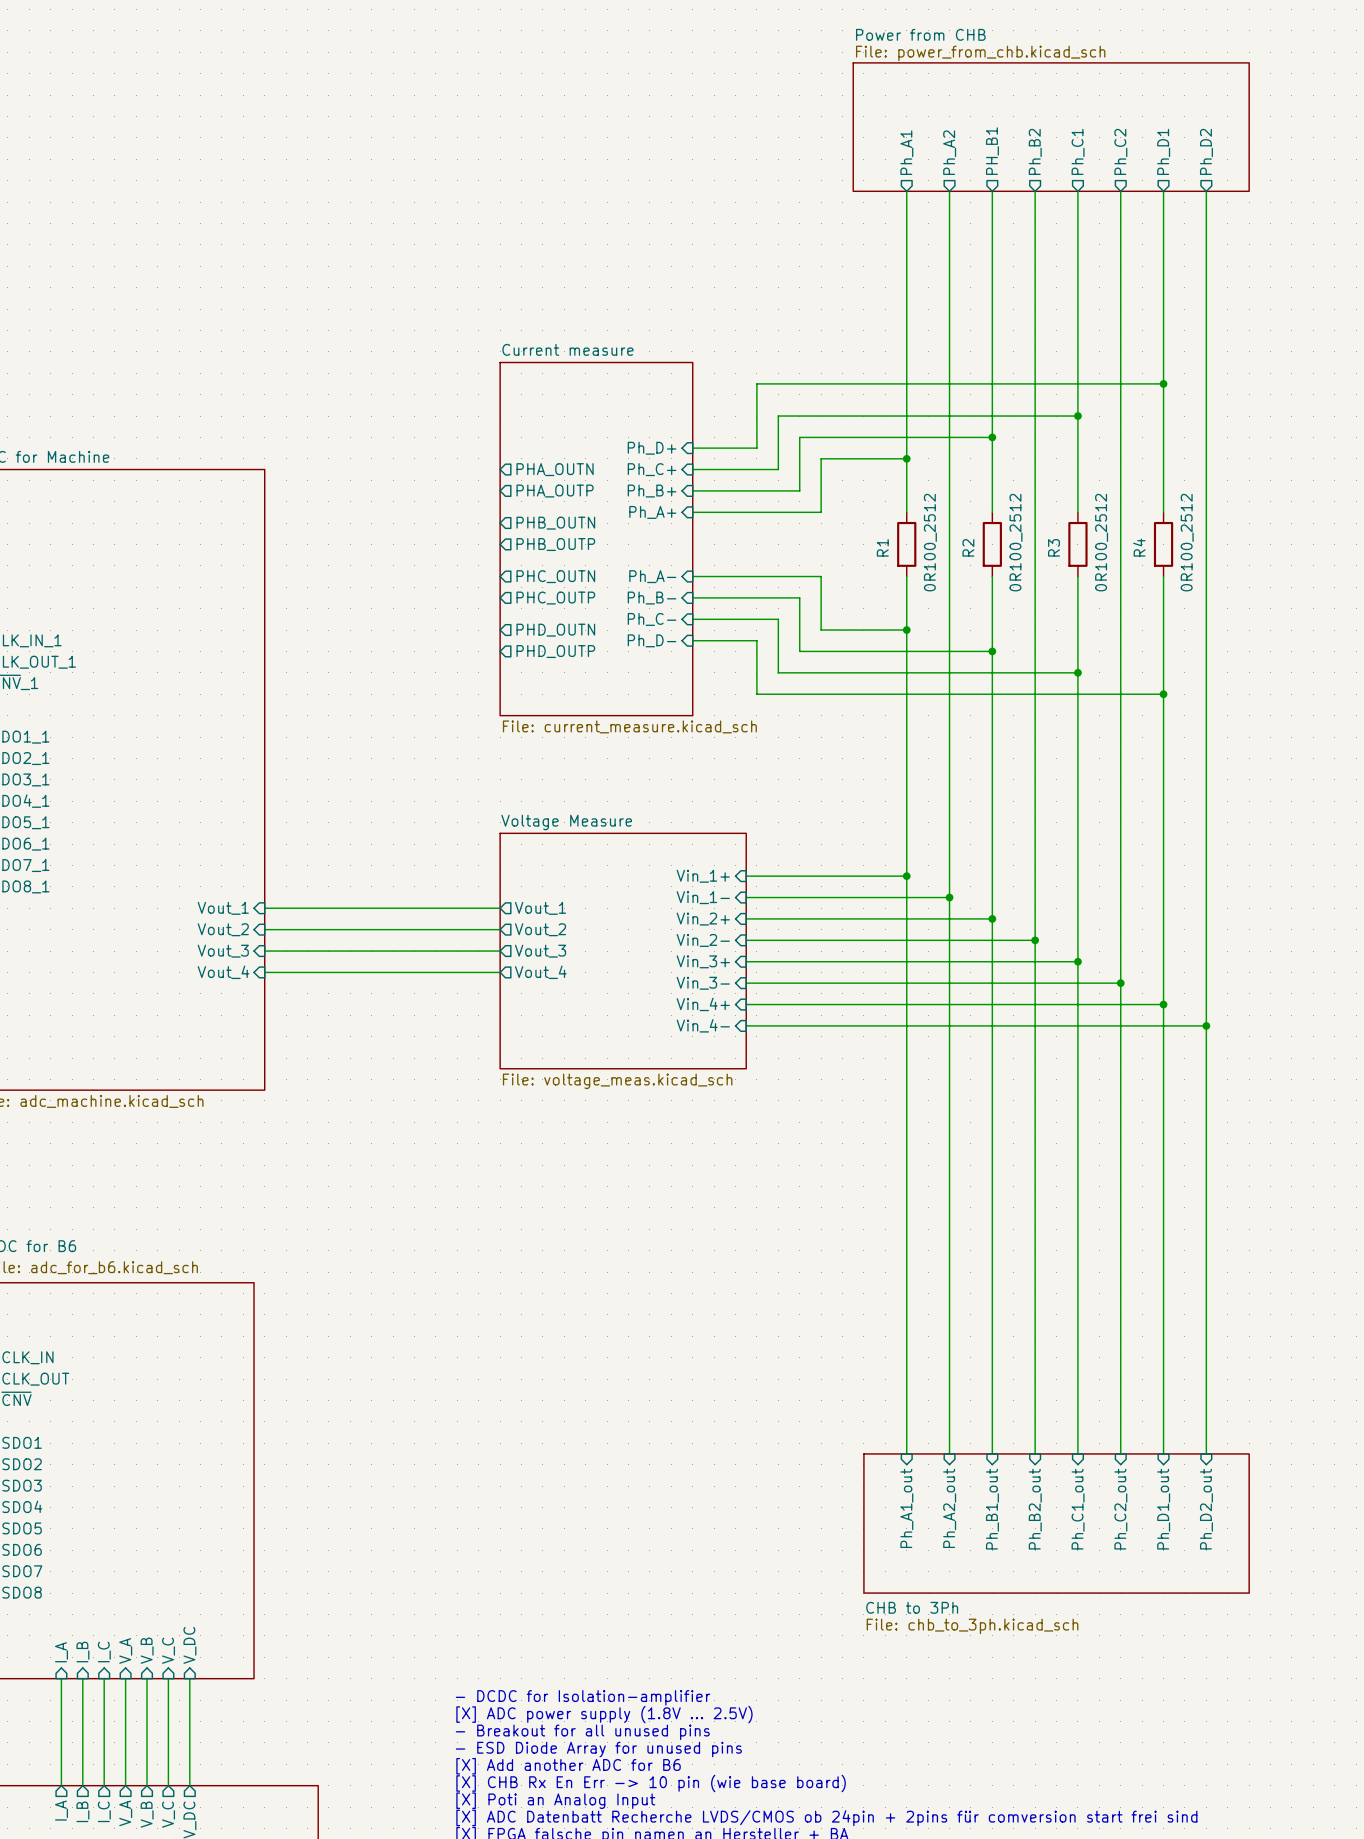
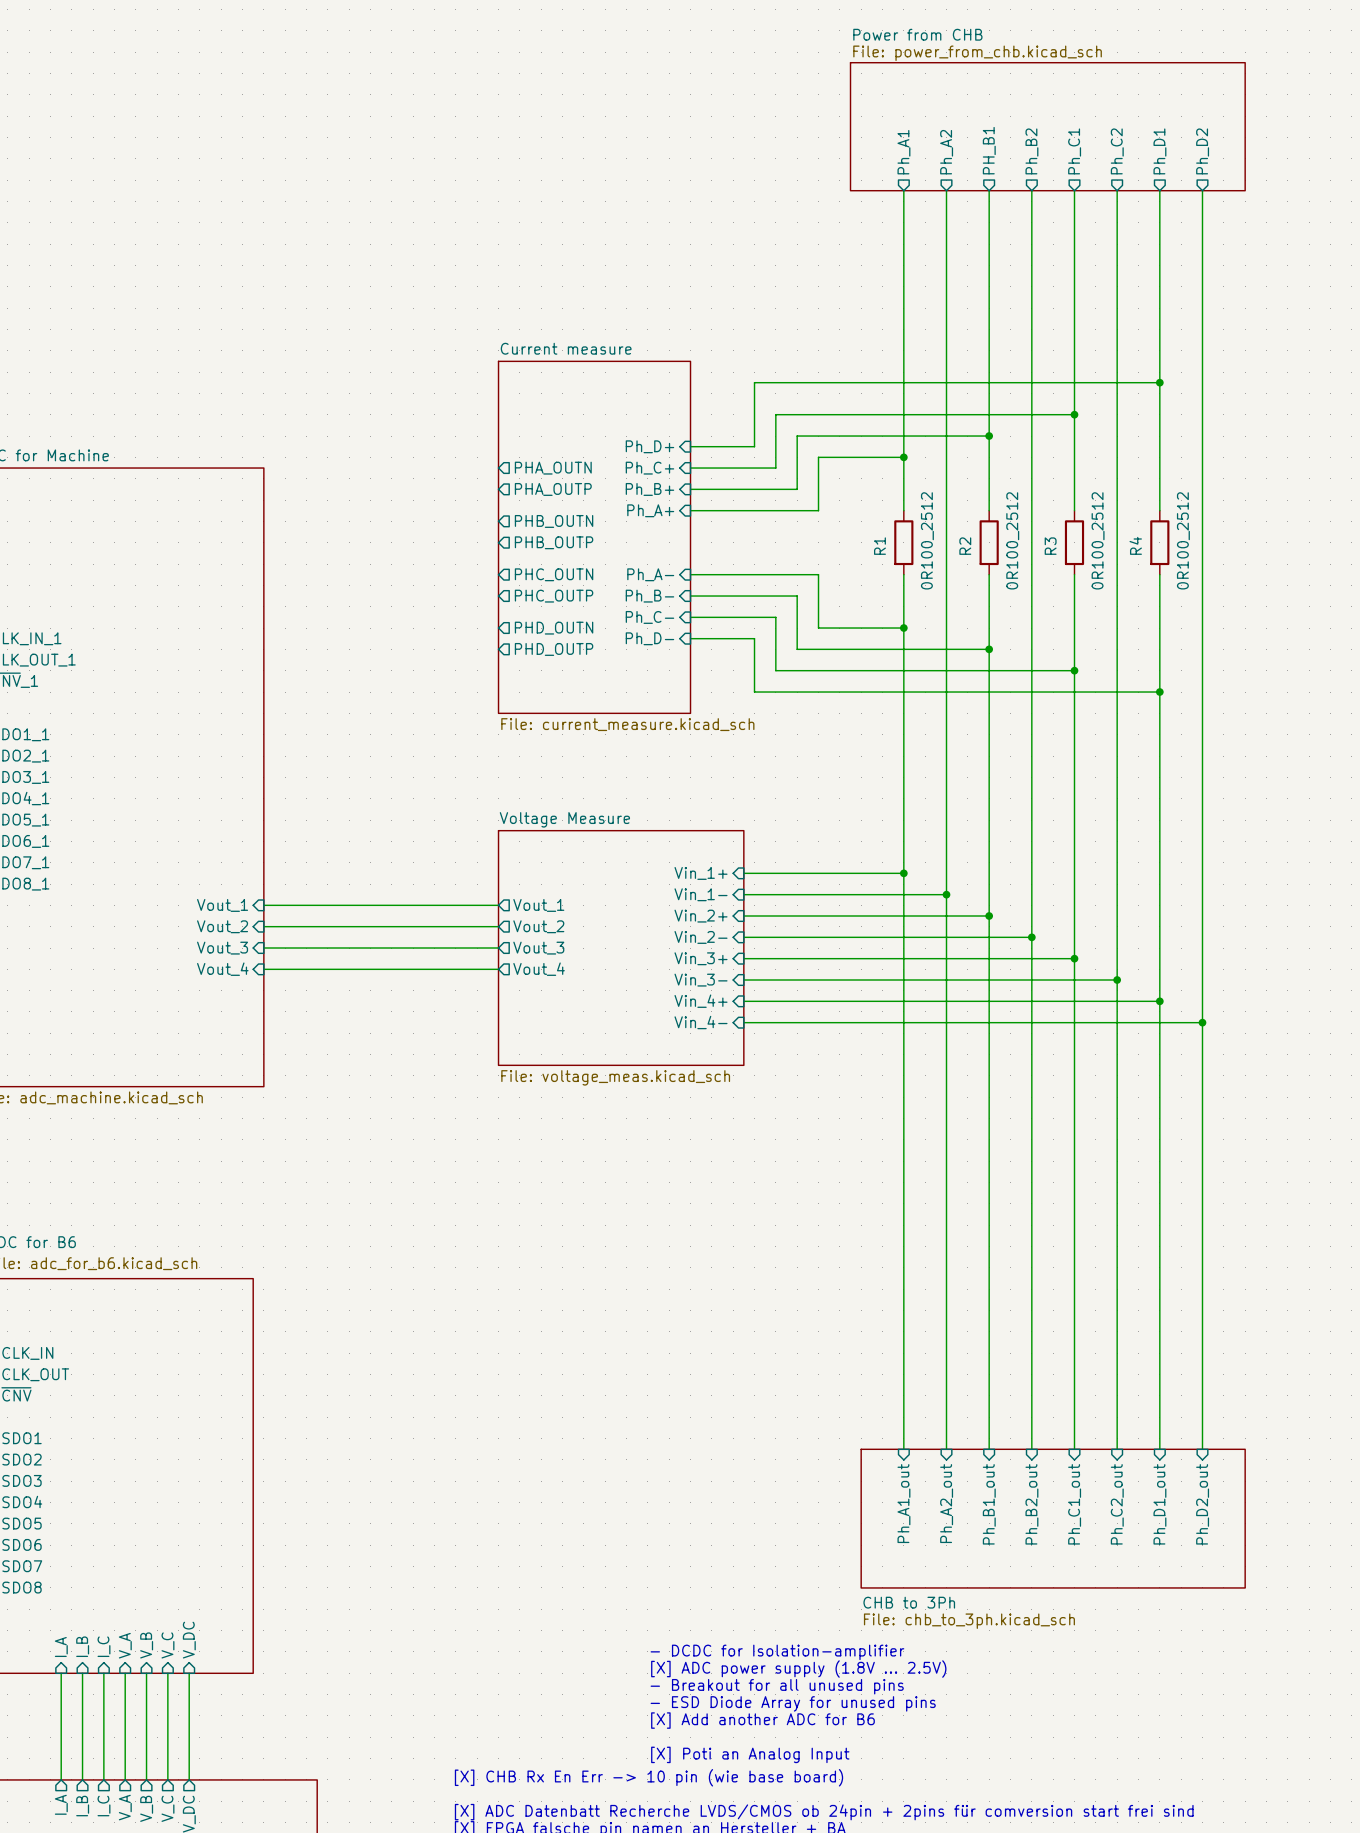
text position: - DCDC for Isolation-amplifier (583, 1697) -> - DCDC for Isolation-amplifier (777, 1652)
text position: [X] ADC power supply (1.8V ... 2.5V) (604, 1714) -> [X] ADC power supply (1.8V ... 2.5V) (798, 1669)
text position: - Breakout for all unused pins (582, 1732) -> - Breakout for all unused pins (777, 1686)
text position: - ESD Diode Array for unused pins (598, 1749) -> - ESD Diode Array for unused pins (793, 1703)
text position: [X] Add another ADC for B6 (568, 1766) -> [X] Add another ADC for B6 (762, 1720)
text position: [X] Poti an Analog Input (555, 1800) -> [X] Poti an Analog Input (750, 1754)

